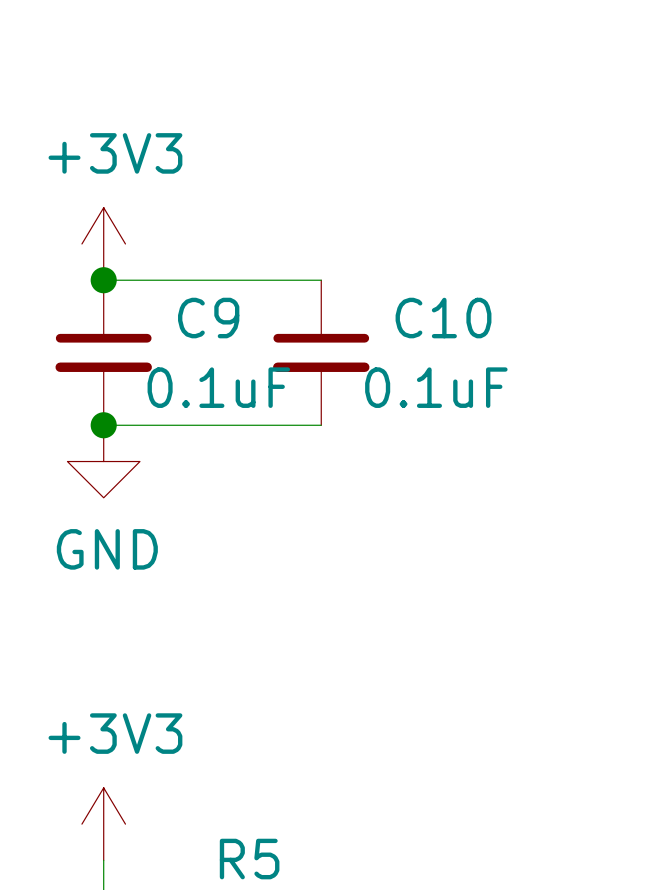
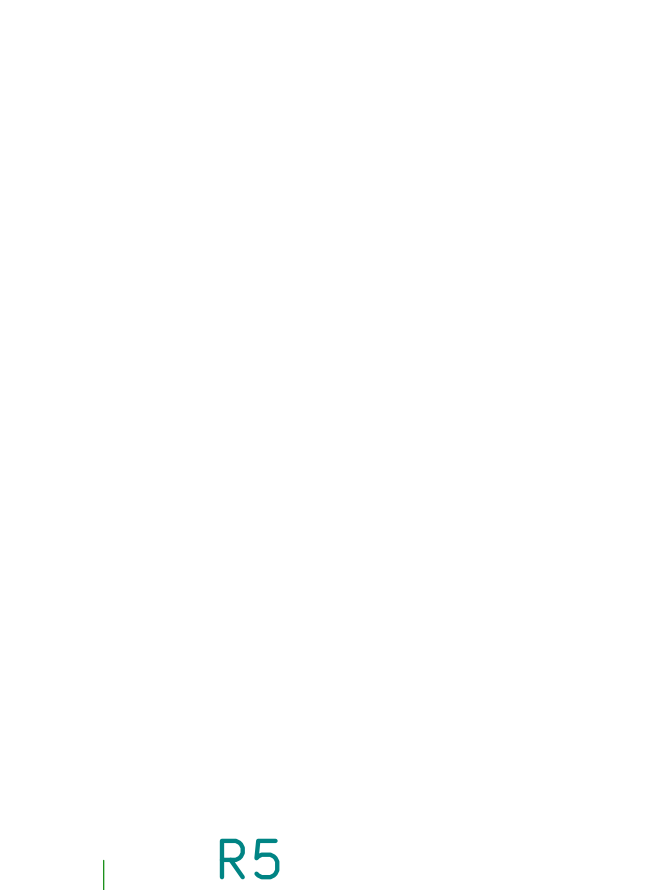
power symbol: +3V3 (103, 243) -> none
wire: (103, 280) (321, 280) -> none
junction: (103, 280) -> none
C9: 0.1uF (103, 352) -> none
C10: 0.1uF (321, 352) -> none
wire: (103, 425) (321, 425) -> none
junction: (103, 425) -> none
power symbol: GND (103, 461) -> none
power symbol: +3V3 (103, 824) -> none

